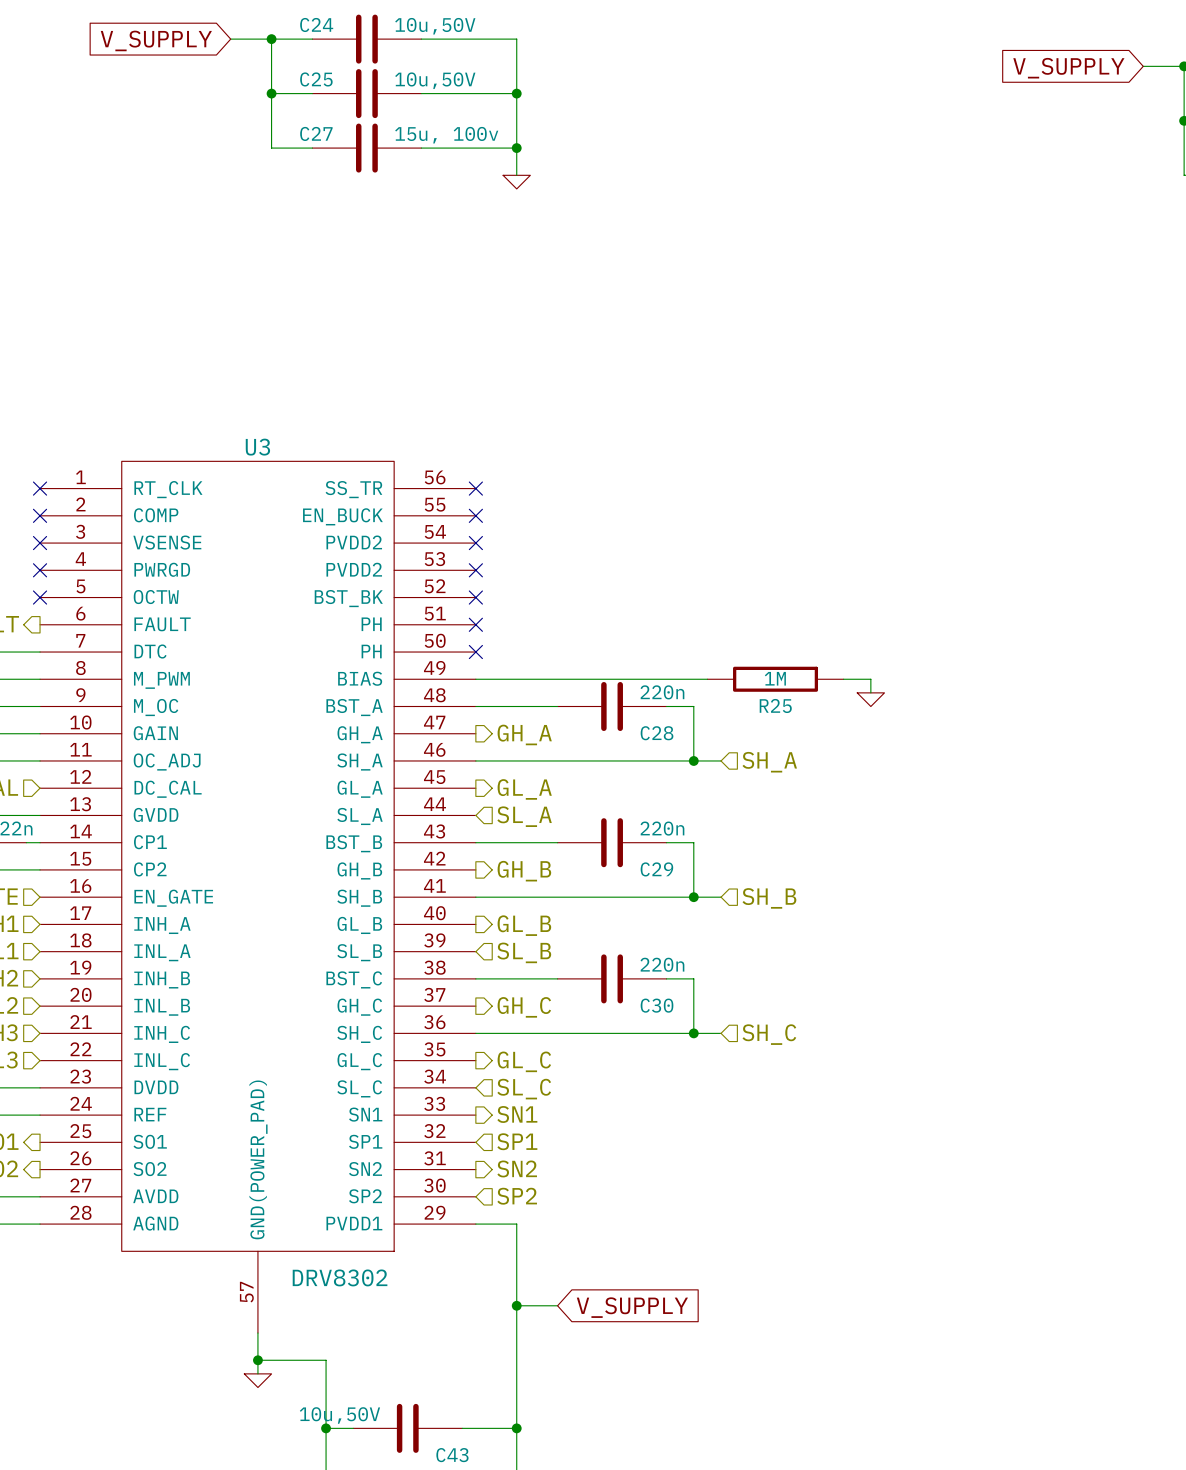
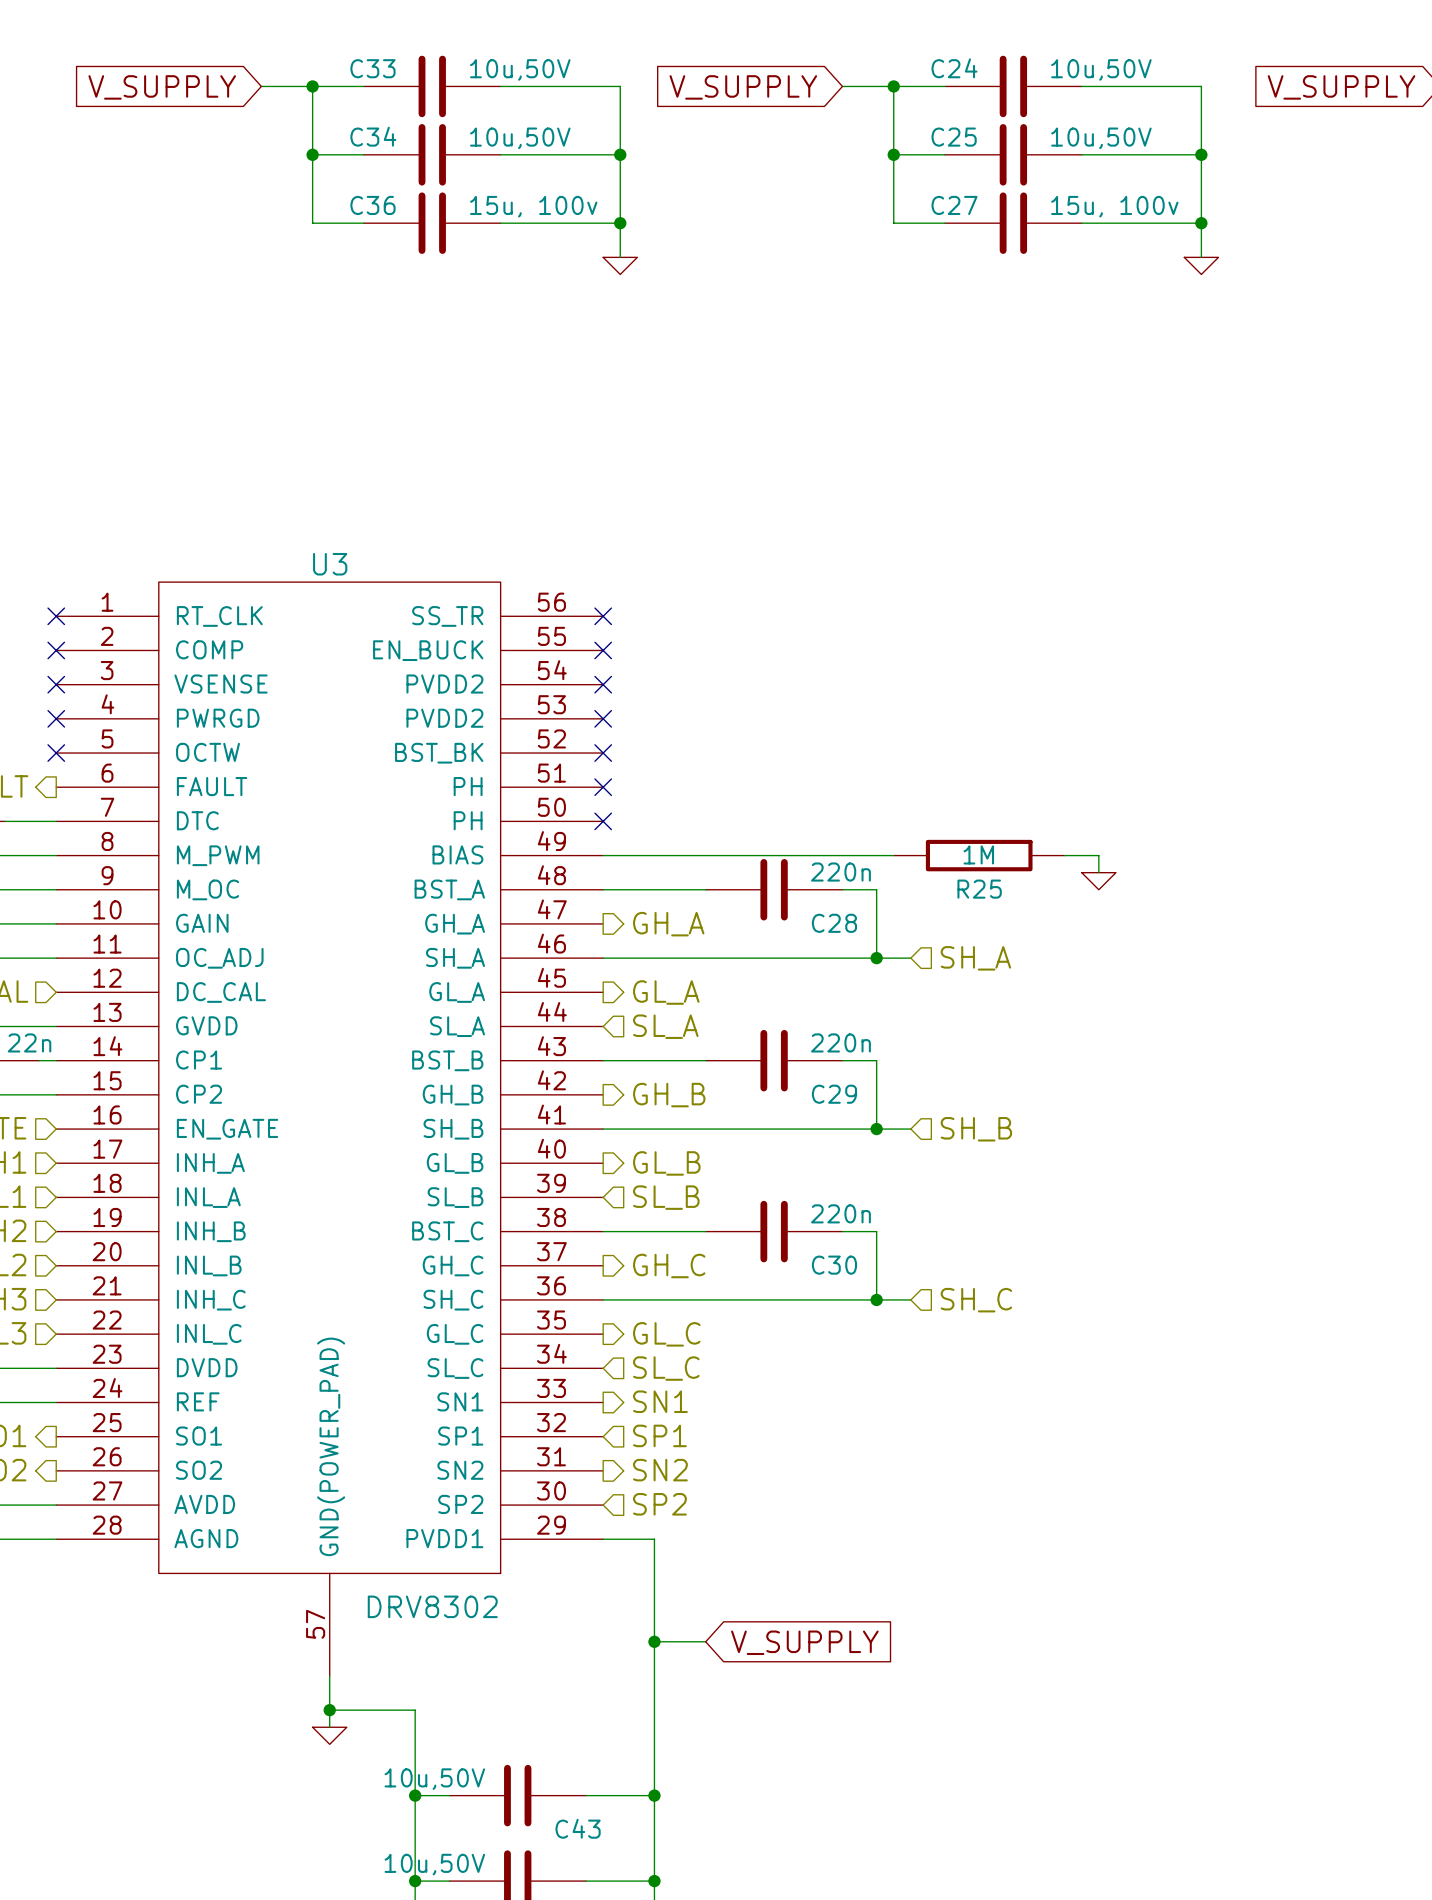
wire: (230, 39) (312, 39) -> (261, 86) (363, 86)
wire: (271, 39) (271, 148) (312, 148) -> (312, 86) (312, 223) (363, 223)
junction: (271, 39) -> none
C24 position: (366, 39) -> (1013, 86)
wire: (421, 39) (516, 39) (516, 175) -> (500, 86) (620, 86) (620, 257)
global label position: V_SUPPLY (156, 40) -> V_SUPPLY (162, 87)
junction: none -> (312, 86)
C33: none -> 10u,50V (432, 86)
wire: none -> (842, 86) (945, 86)
wire: none -> (893, 86) (893, 223) (945, 223)
junction: none -> (893, 86)
wire: none -> (1081, 86) (1201, 86) (1201, 257)
global label: none -> V_SUPPLY (743, 87)
wire: (271, 93) (312, 93) -> (312, 154) (363, 154)
junction: (271, 93) -> none
C25 position: (366, 93) -> (1013, 154)
wire: (421, 93) (516, 93) -> (500, 154) (620, 154)
junction: (516, 93) -> none
junction: none -> (312, 154)
C34: none -> 10u,50V (432, 154)
junction: none -> (620, 154)
wire: none -> (893, 154) (945, 154)
junction: none -> (893, 154)
wire: none -> (1081, 154) (1201, 154)
junction: none -> (1201, 154)
C27 position: (366, 148) -> (1013, 223)
wire: (421, 148) (516, 148) -> (500, 223) (620, 223)
junction: (516, 148) -> none
C36: none -> 15u, 100v (432, 223)
junction: none -> (620, 223)
wire: none -> (1081, 223) (1201, 223)
junction: none -> (1201, 223)
power symbol position: (516, 182) -> (620, 265)
power symbol: none -> (1201, 265)

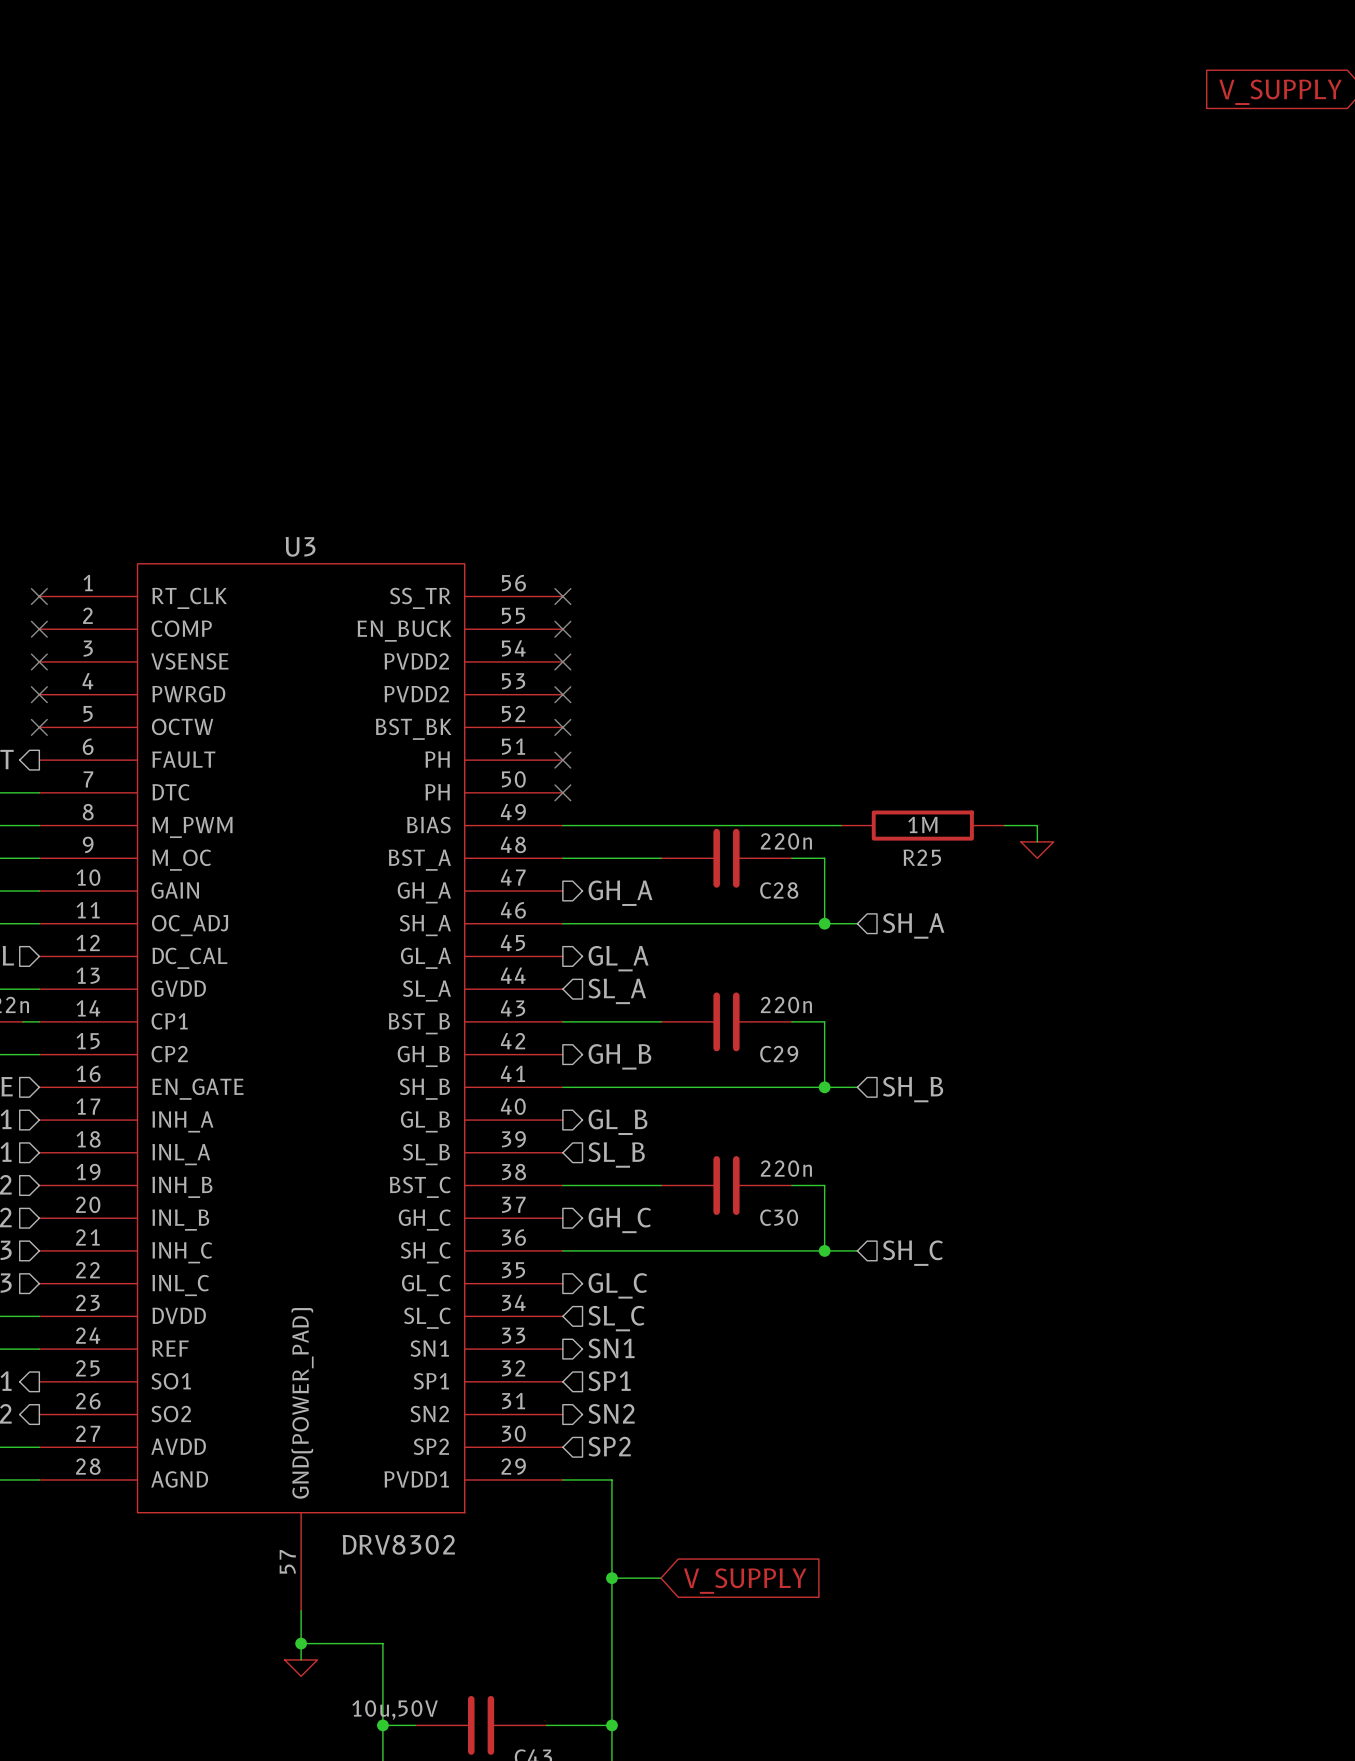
wire: (261, 86) (363, 86) -> none
wire: (312, 86) (312, 223) (363, 223) -> none
junction: (312, 86) -> none
C33: 10u,50V (432, 86) -> none
wire: (500, 86) (620, 86) (620, 257) -> none
wire: (842, 86) (945, 86) -> none
wire: (893, 86) (893, 223) (945, 223) -> none
junction: (893, 86) -> none
C24: 10u,50V (1013, 86) -> none
wire: (1081, 86) (1201, 86) (1201, 257) -> none
global label: V_SUPPLY (162, 87) -> none
global label: V_SUPPLY (743, 87) -> none
wire: (312, 154) (363, 154) -> none
junction: (312, 154) -> none
C34: 10u,50V (432, 154) -> none
wire: (500, 154) (620, 154) -> none
junction: (620, 154) -> none
wire: (893, 154) (945, 154) -> none
junction: (893, 154) -> none
C25: 10u,50V (1013, 154) -> none
wire: (1081, 154) (1201, 154) -> none
junction: (1201, 154) -> none
C36: 15u, 100v (432, 223) -> none
wire: (500, 223) (620, 223) -> none
junction: (620, 223) -> none
C27: 15u, 100v (1013, 223) -> none
wire: (1081, 223) (1201, 223) -> none
junction: (1201, 223) -> none
power symbol: (620, 265) -> none
power symbol: (1201, 265) -> none

